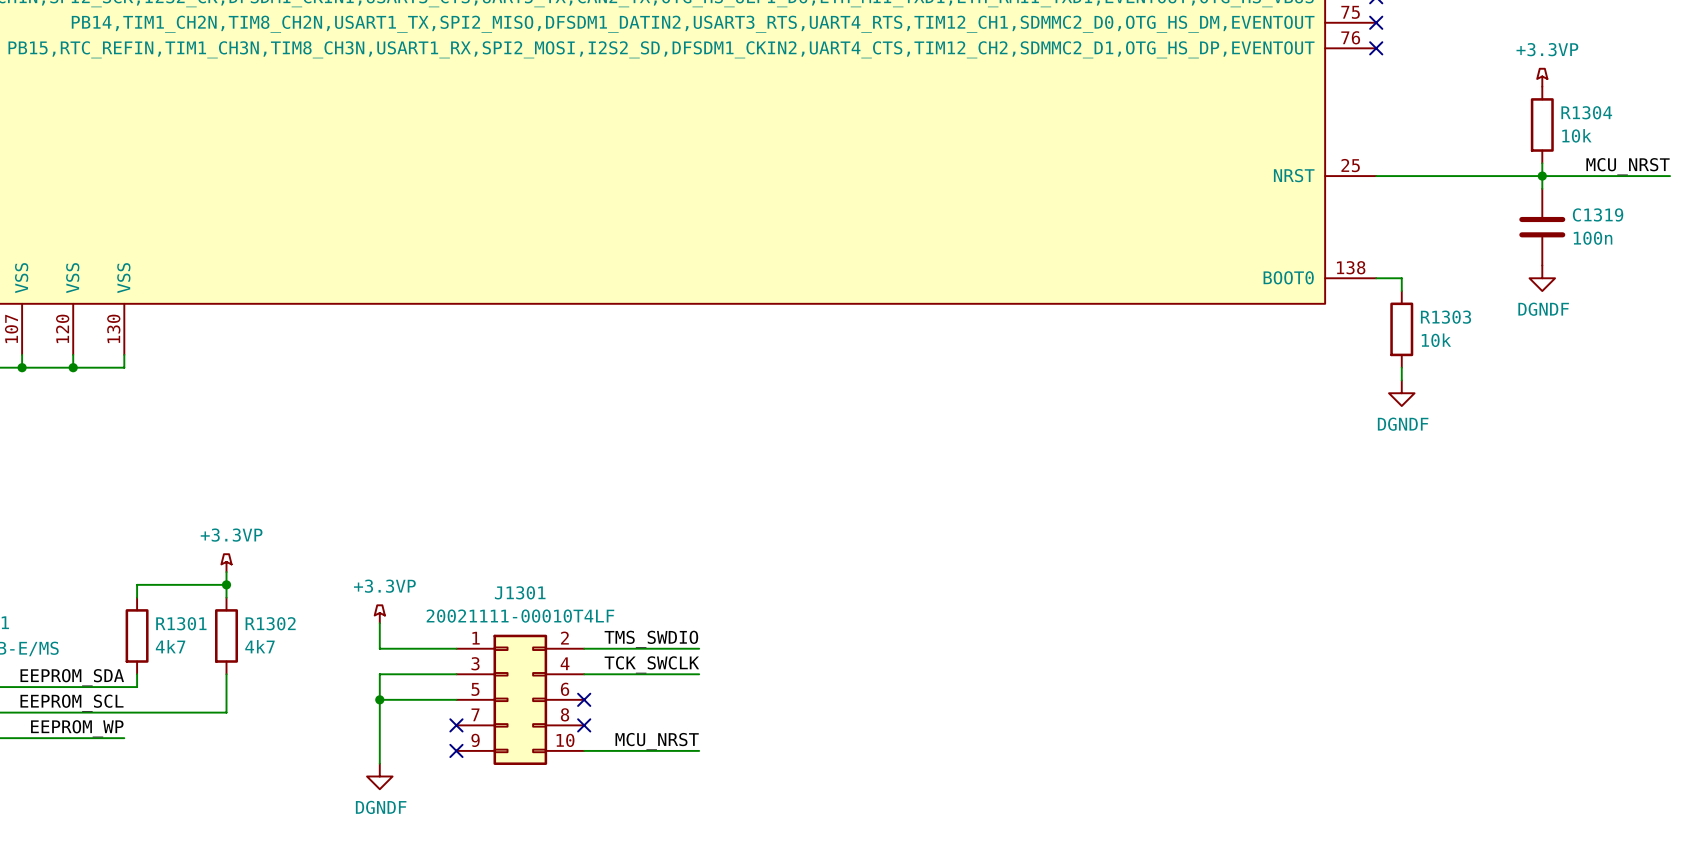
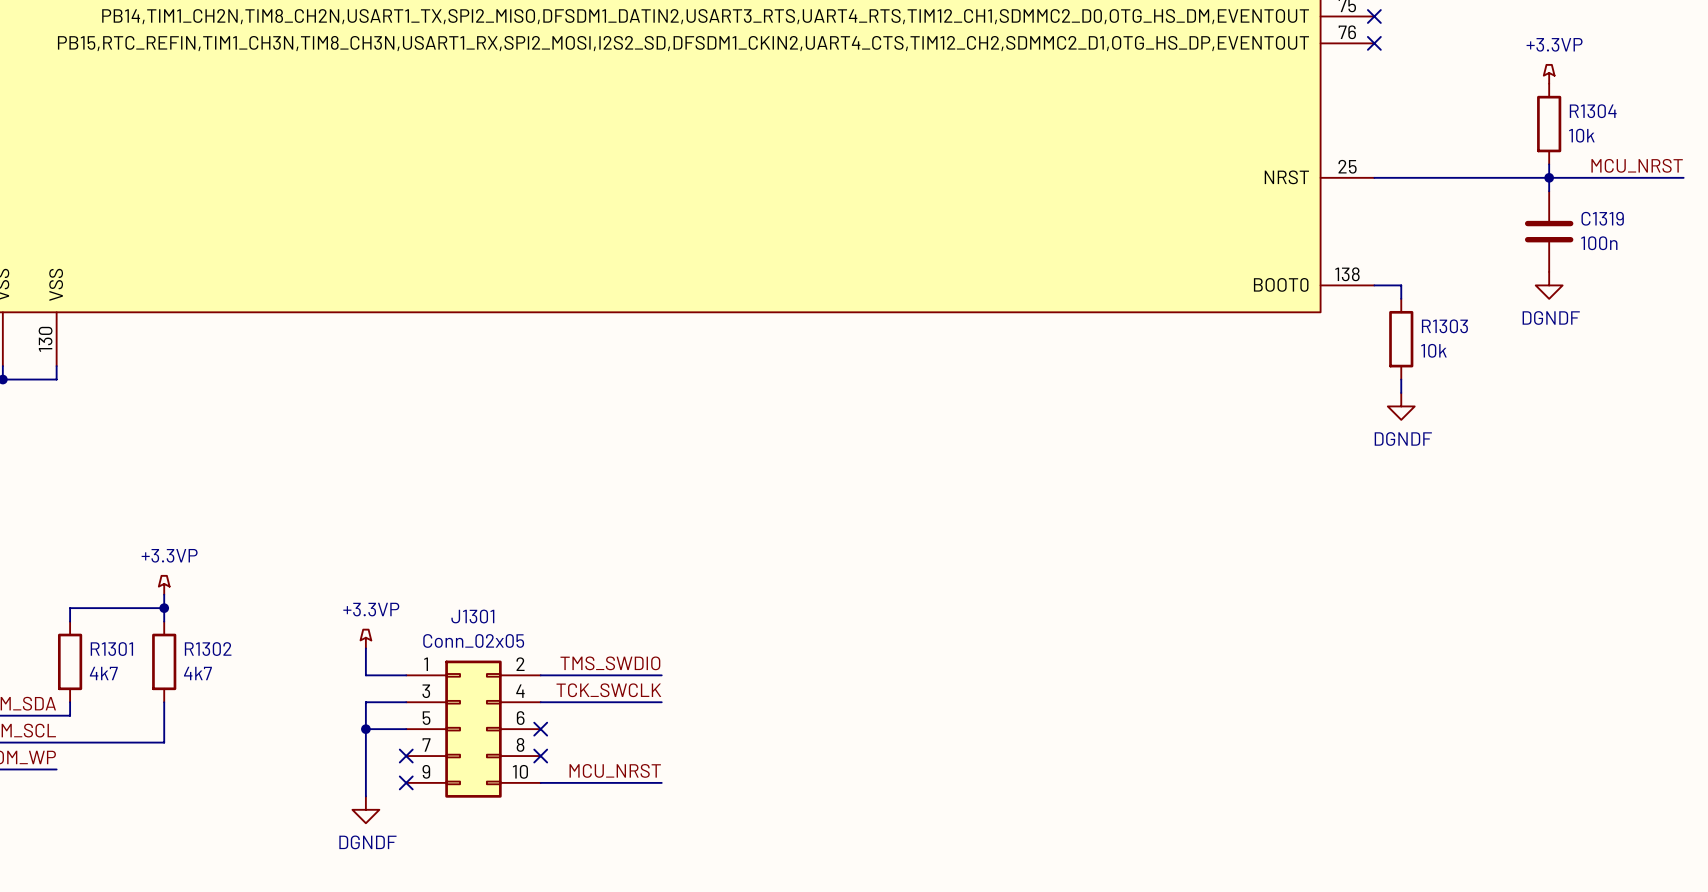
power symbol position: +3.3VP (379, 614) -> +3.3VP (365, 639)
J1301 value: 20021111-00010T4LF (520, 616) -> Conn_02x05 (473, 640)
wire: (379, 623) (379, 648) (418, 648) -> (365, 648) (365, 675)
wire: (418, 674) (379, 674) (379, 763) -> (365, 702) (365, 796)
wire: (379, 699) (418, 699) -> none
junction position: (379, 699) -> (365, 729)
power symbol position: DGNDF (379, 776) -> DGNDF (365, 809)

